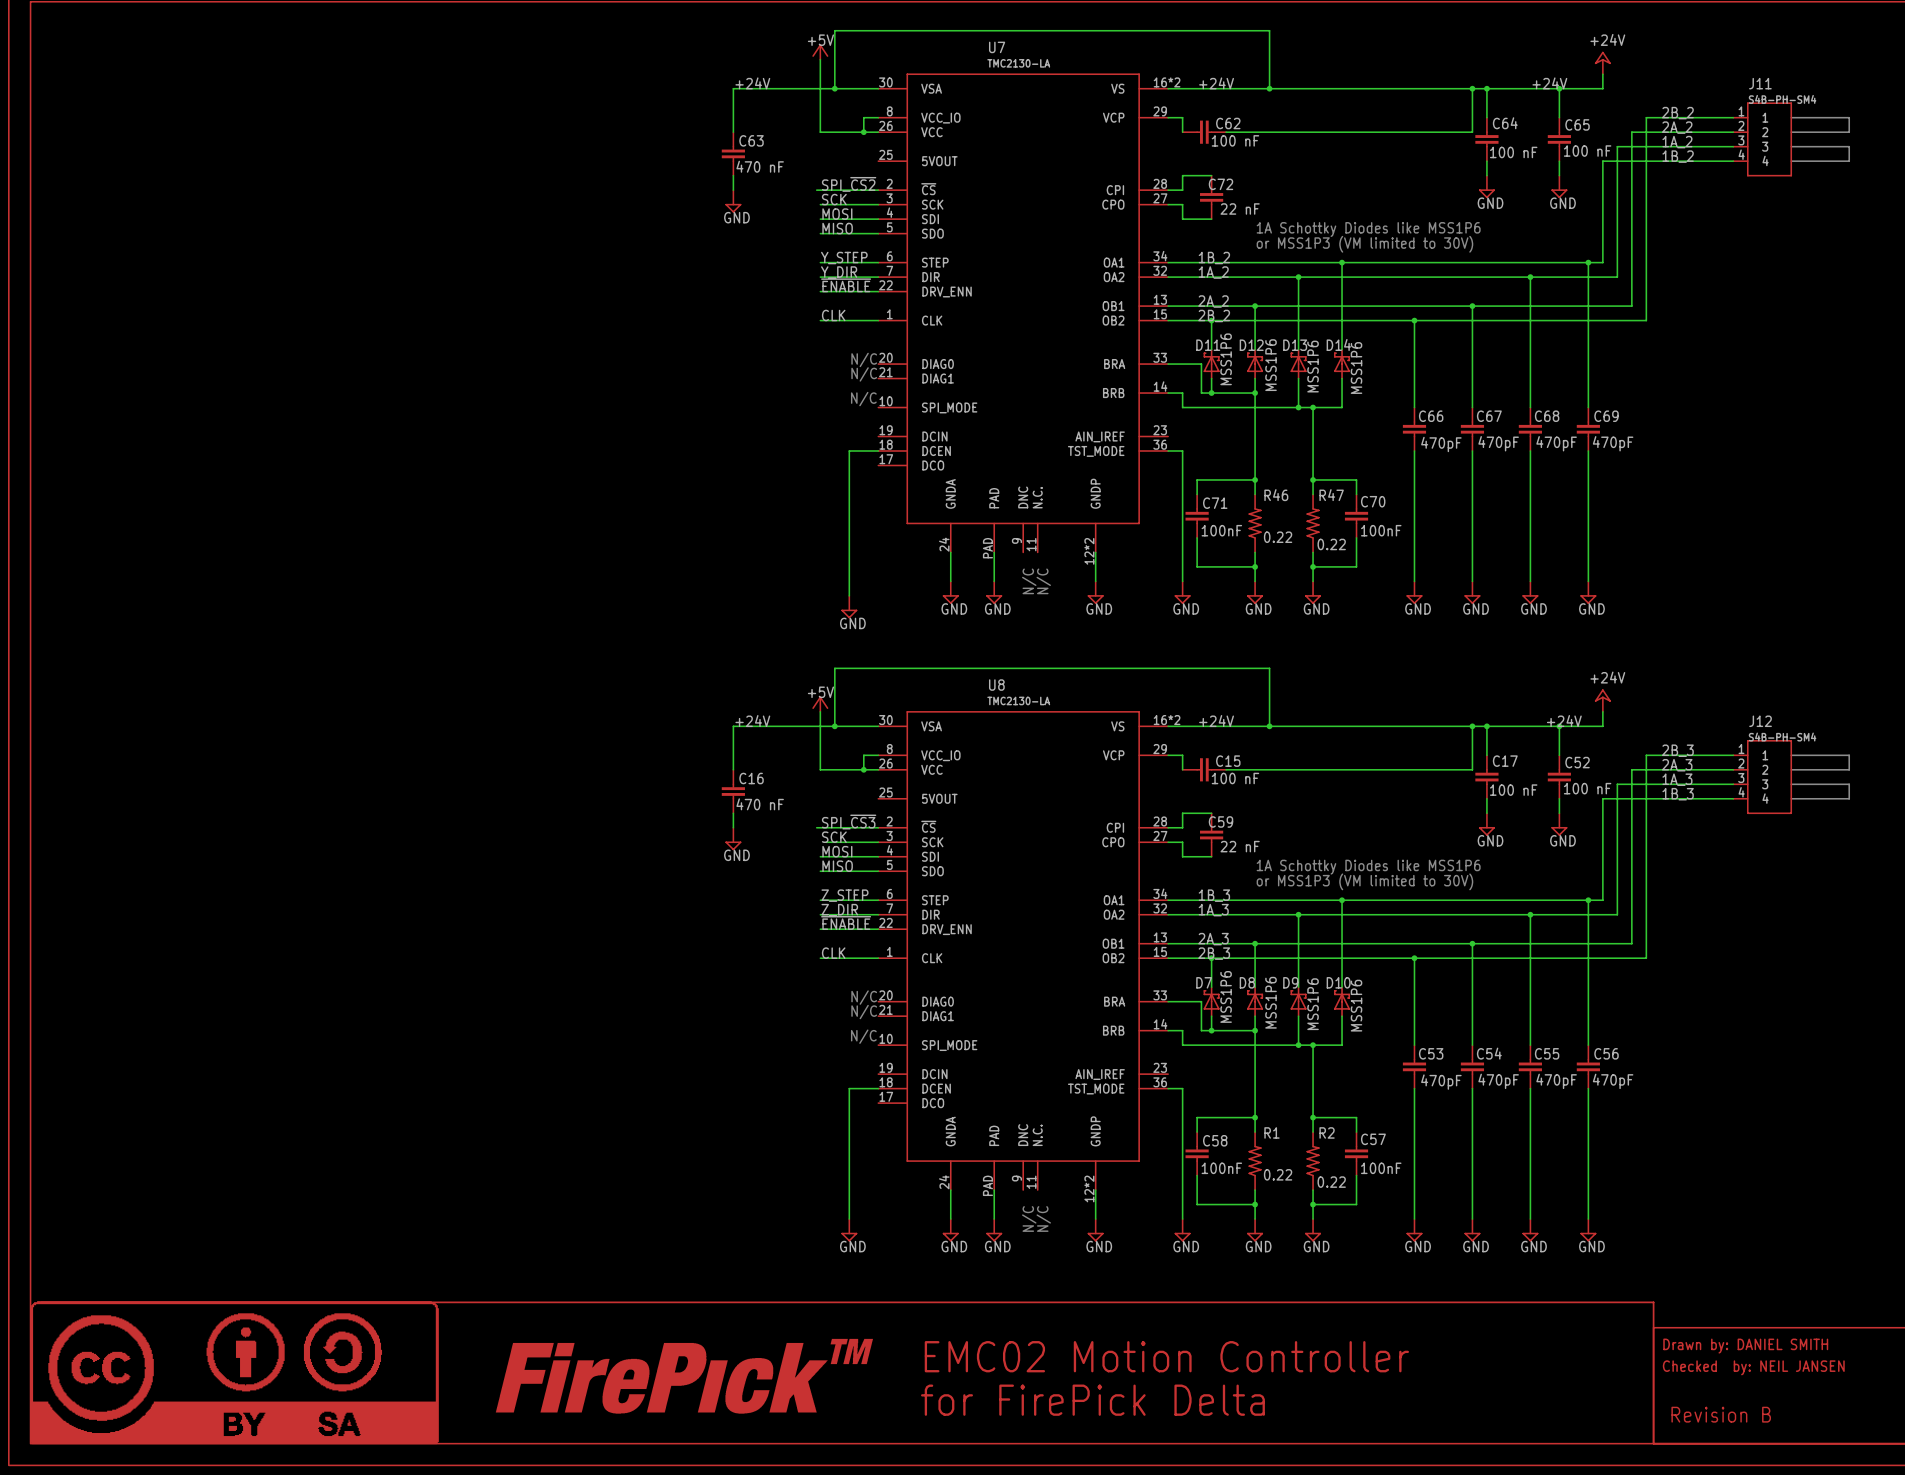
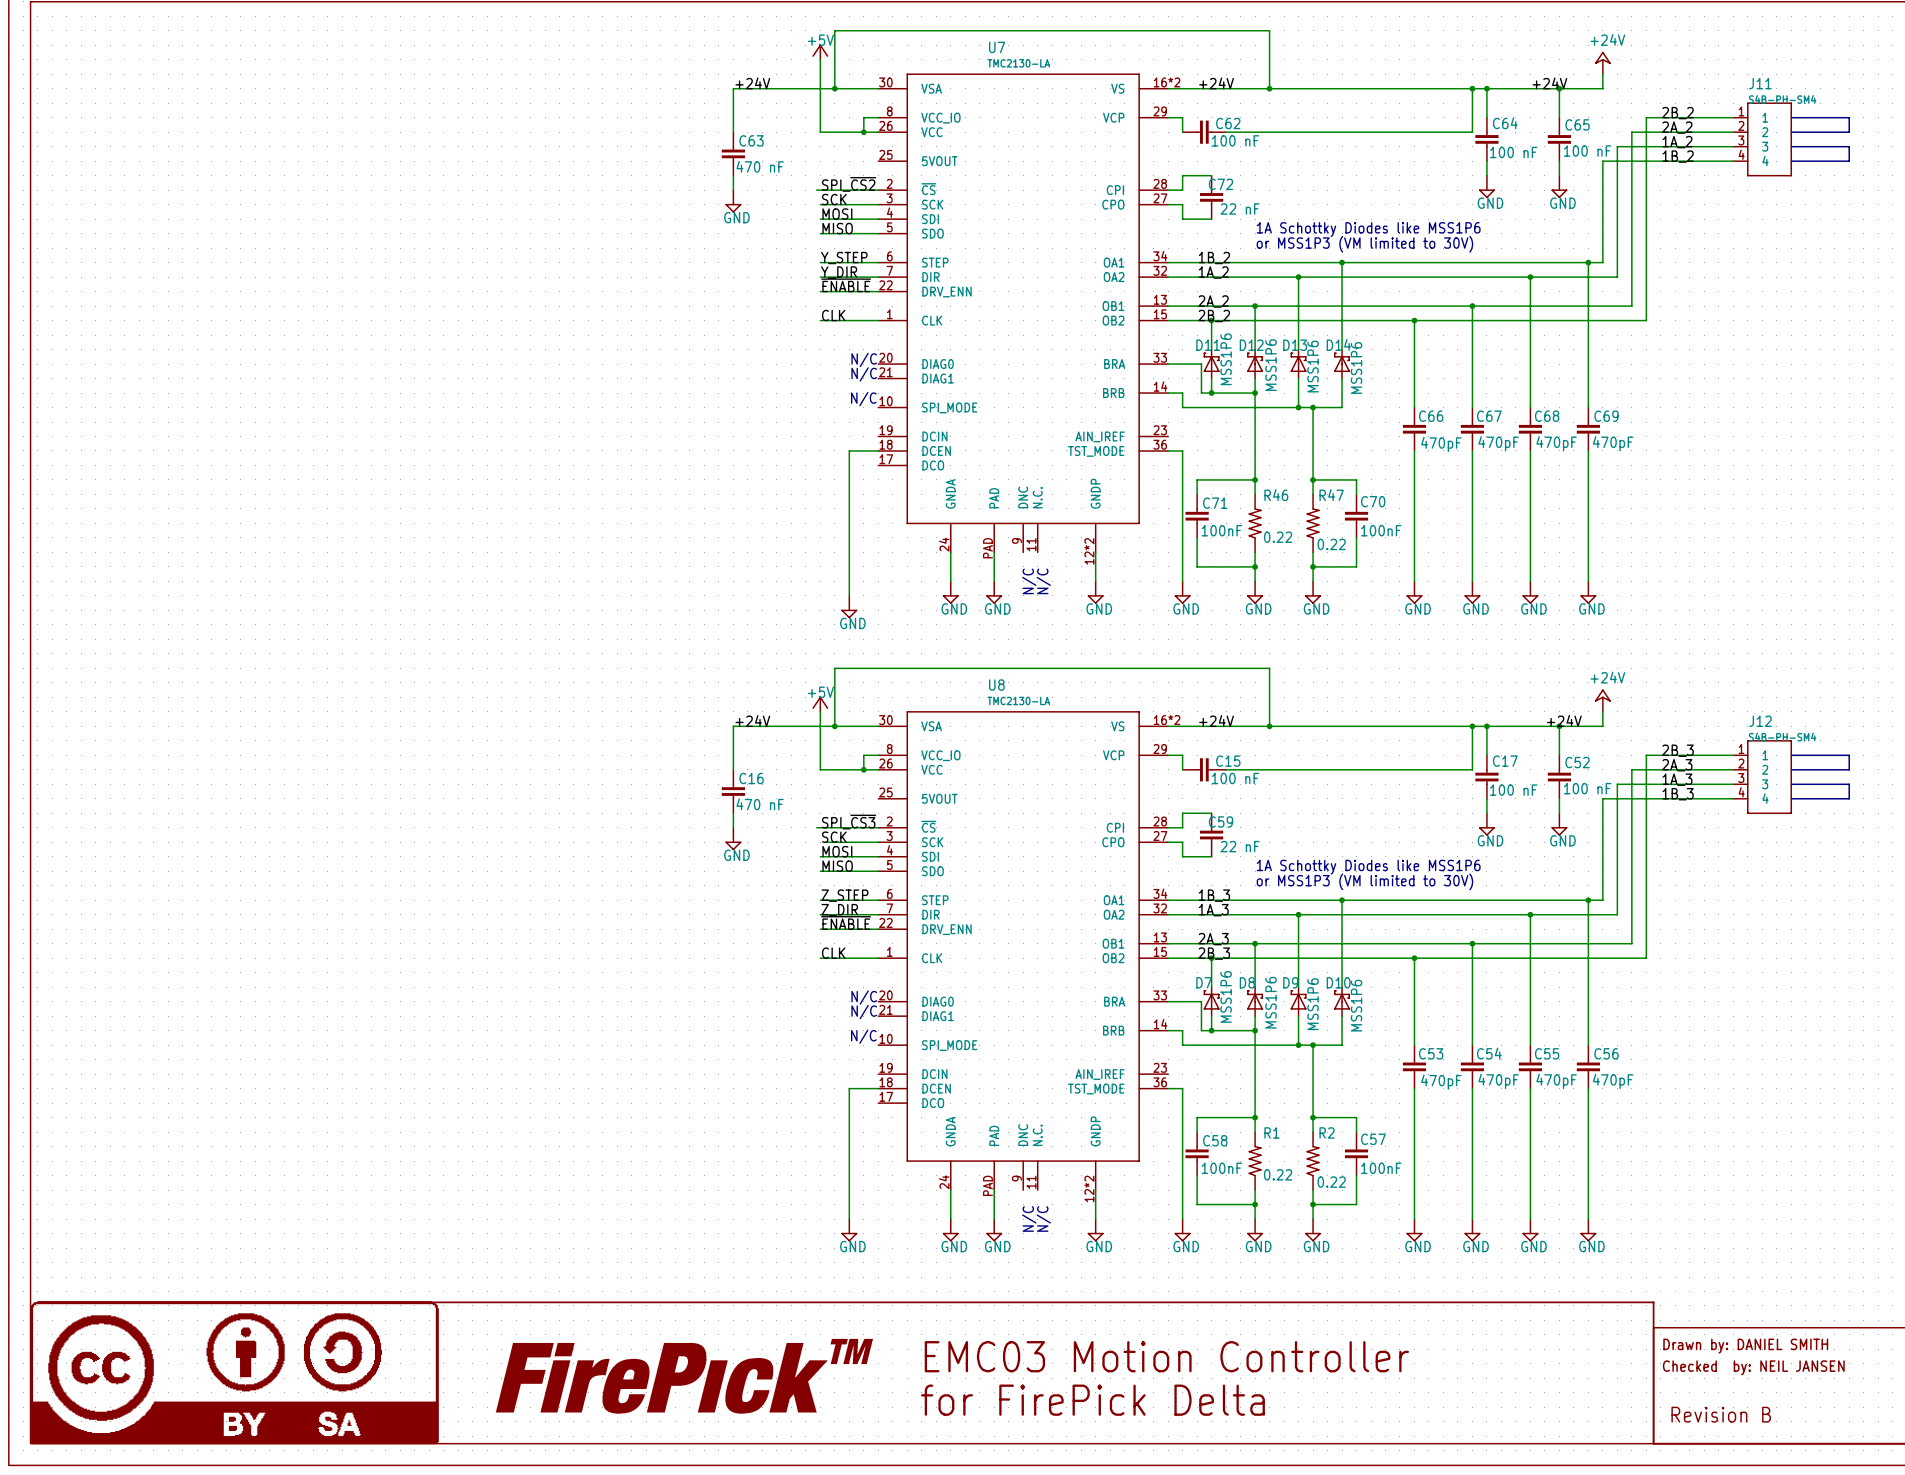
text: EMC02 Motion Controller (1166, 1356) -> EMC03 Motion Controller (1166, 1356)

